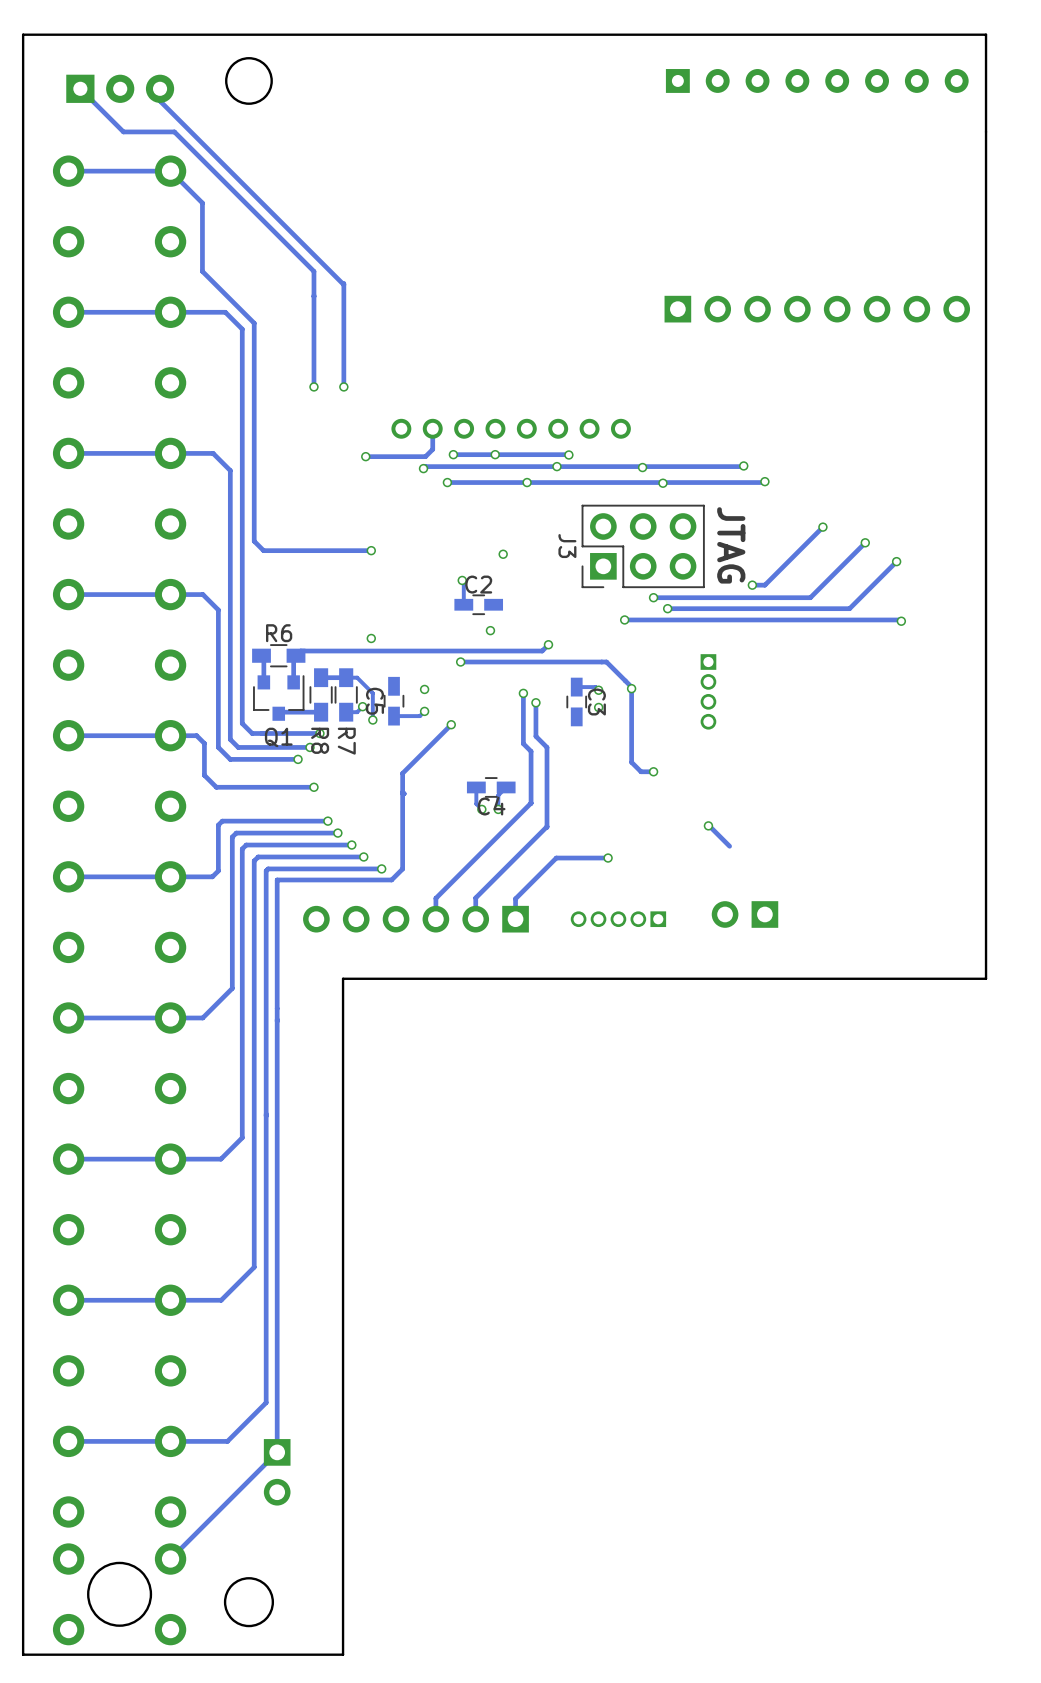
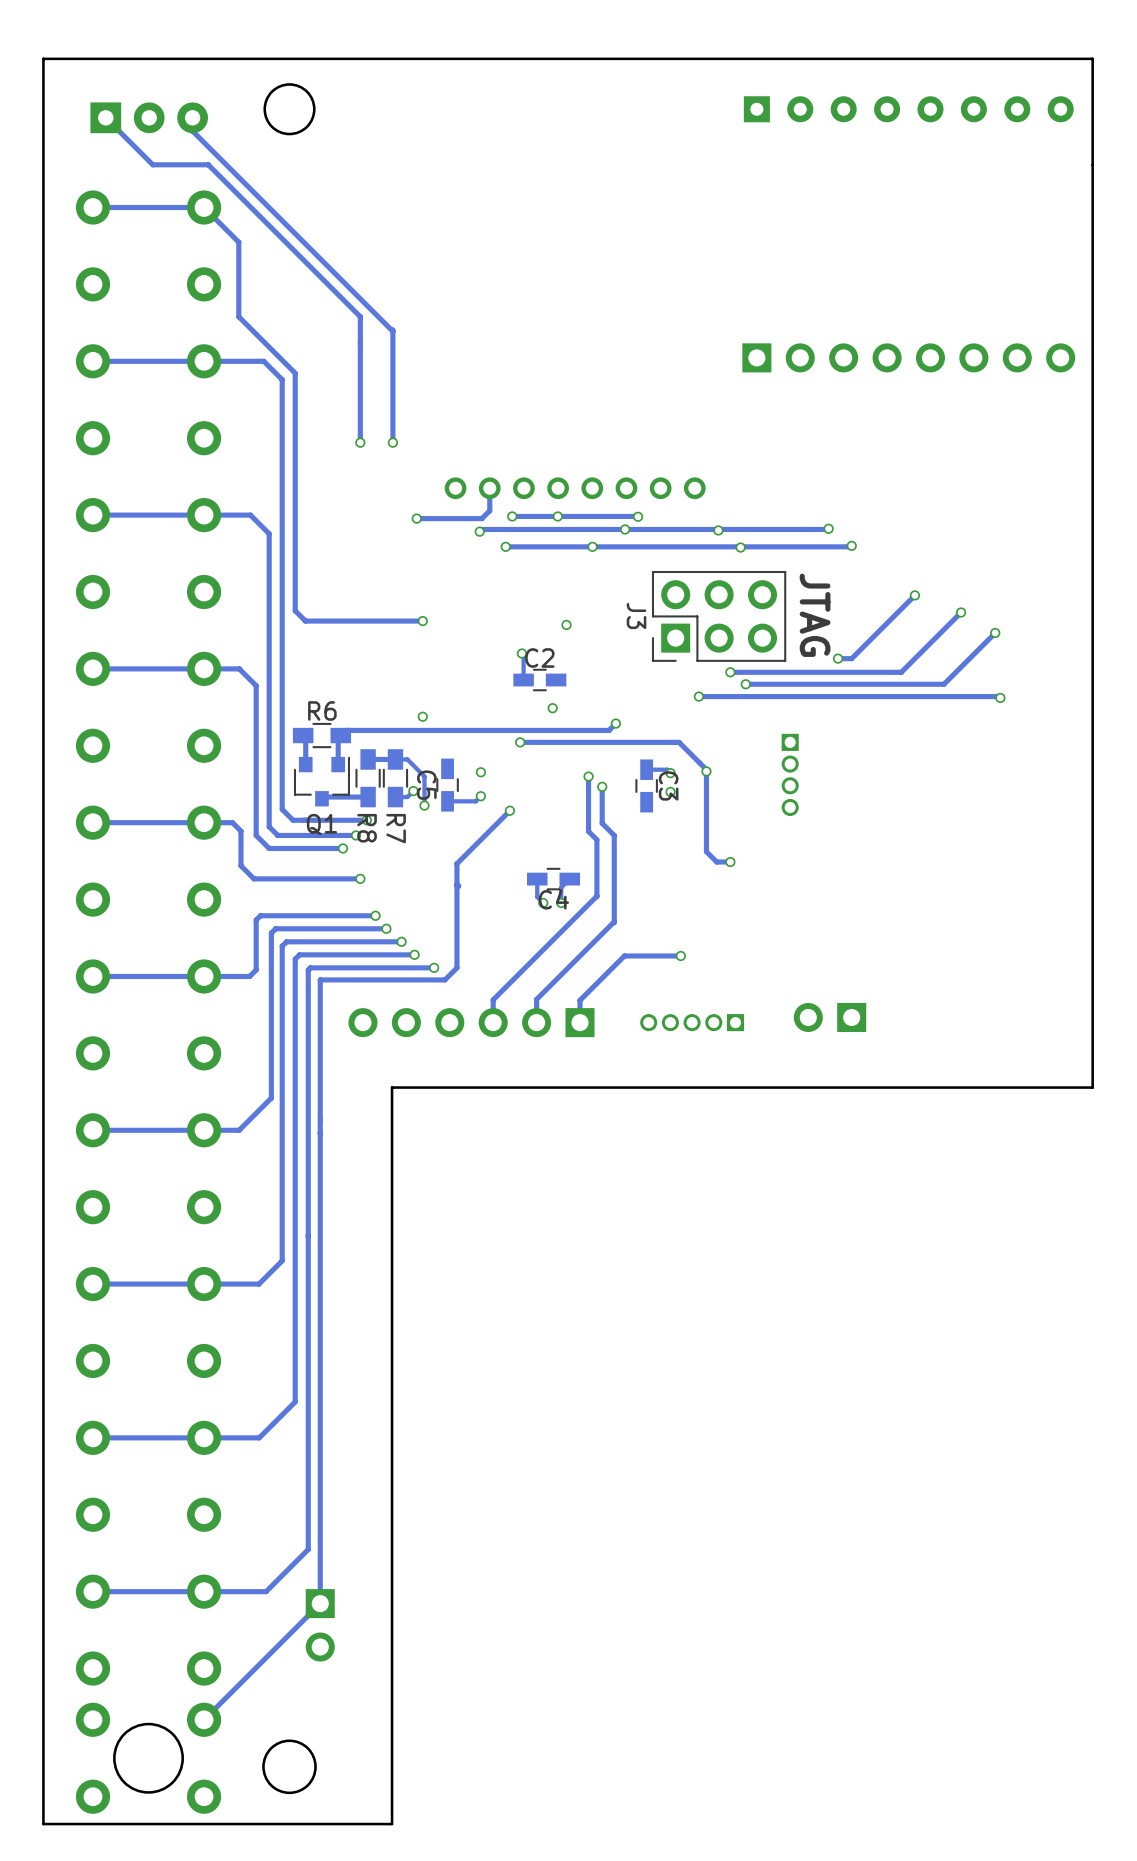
track: (708, 825) (729, 846) -> none
via: (708, 825) -> none

